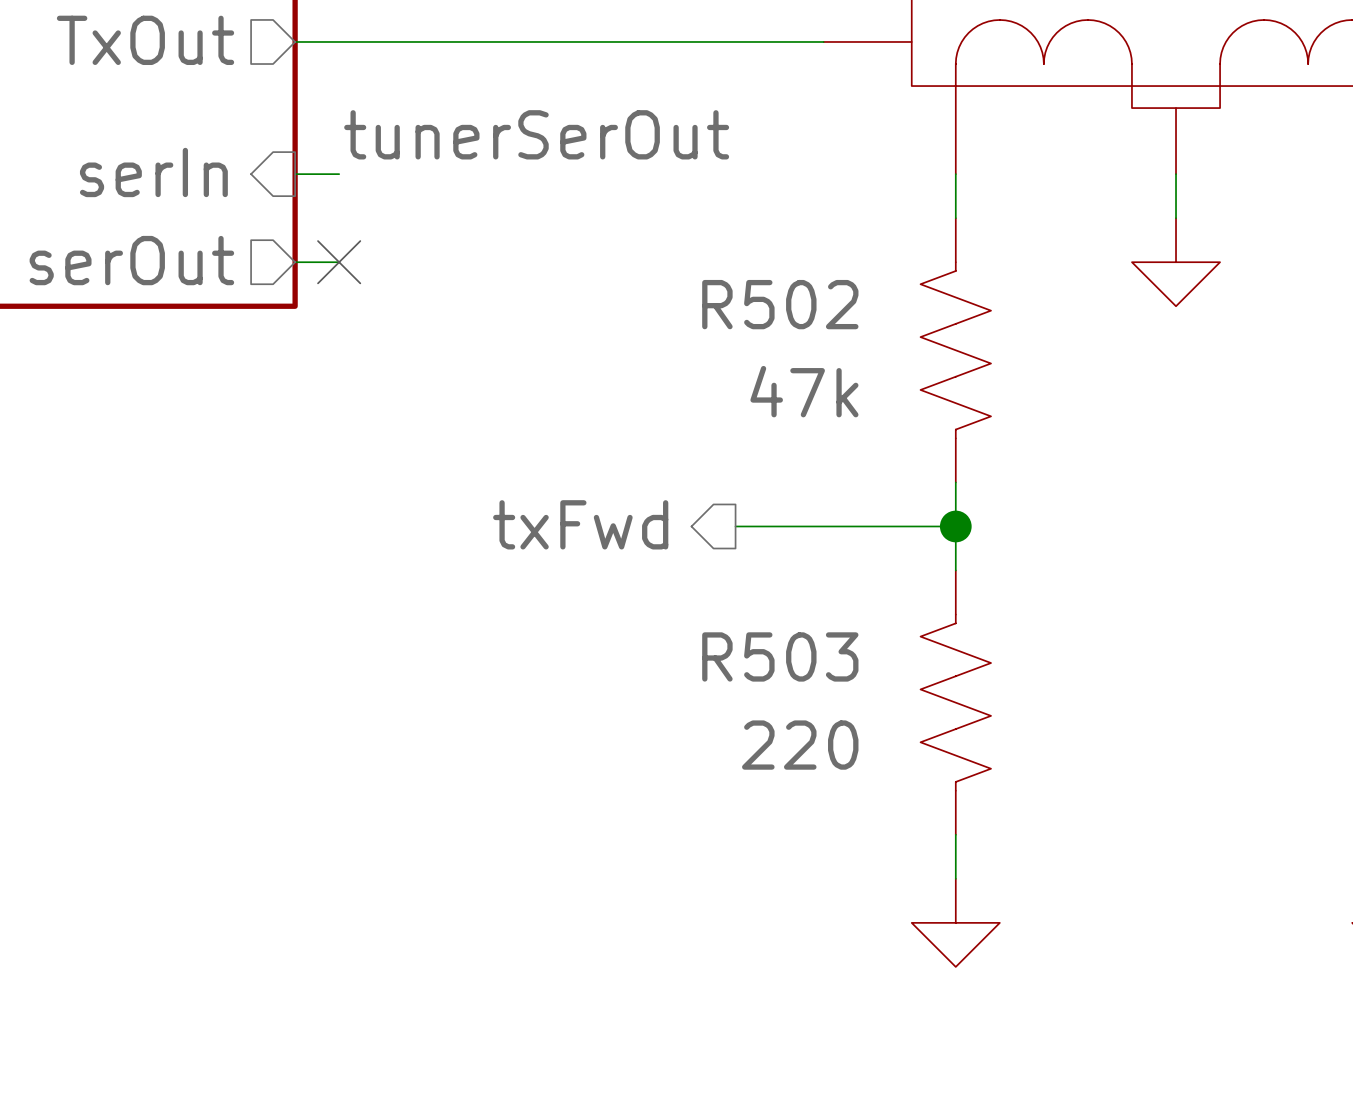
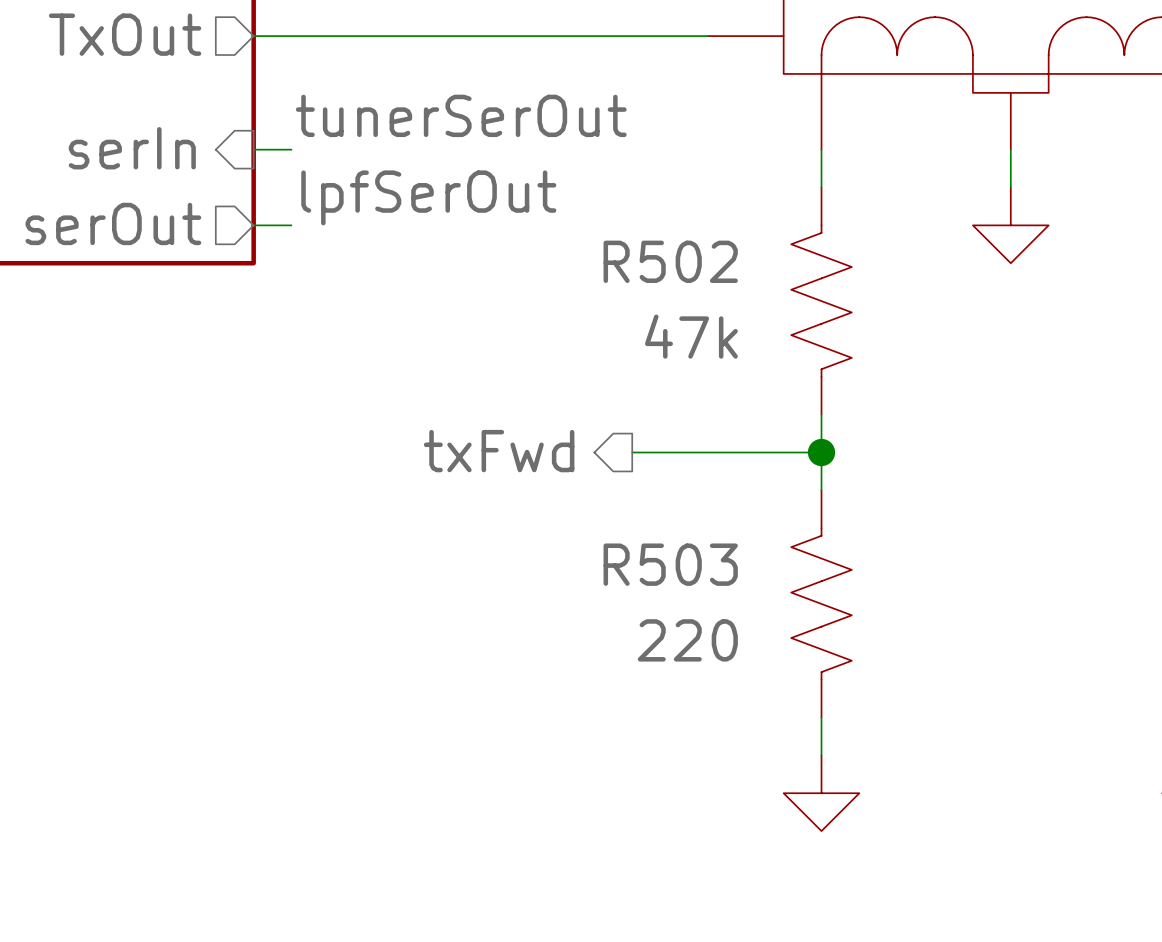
label: none -> lpfSerOut (428, 197)
no-connect mark: (339, 262) -> none

